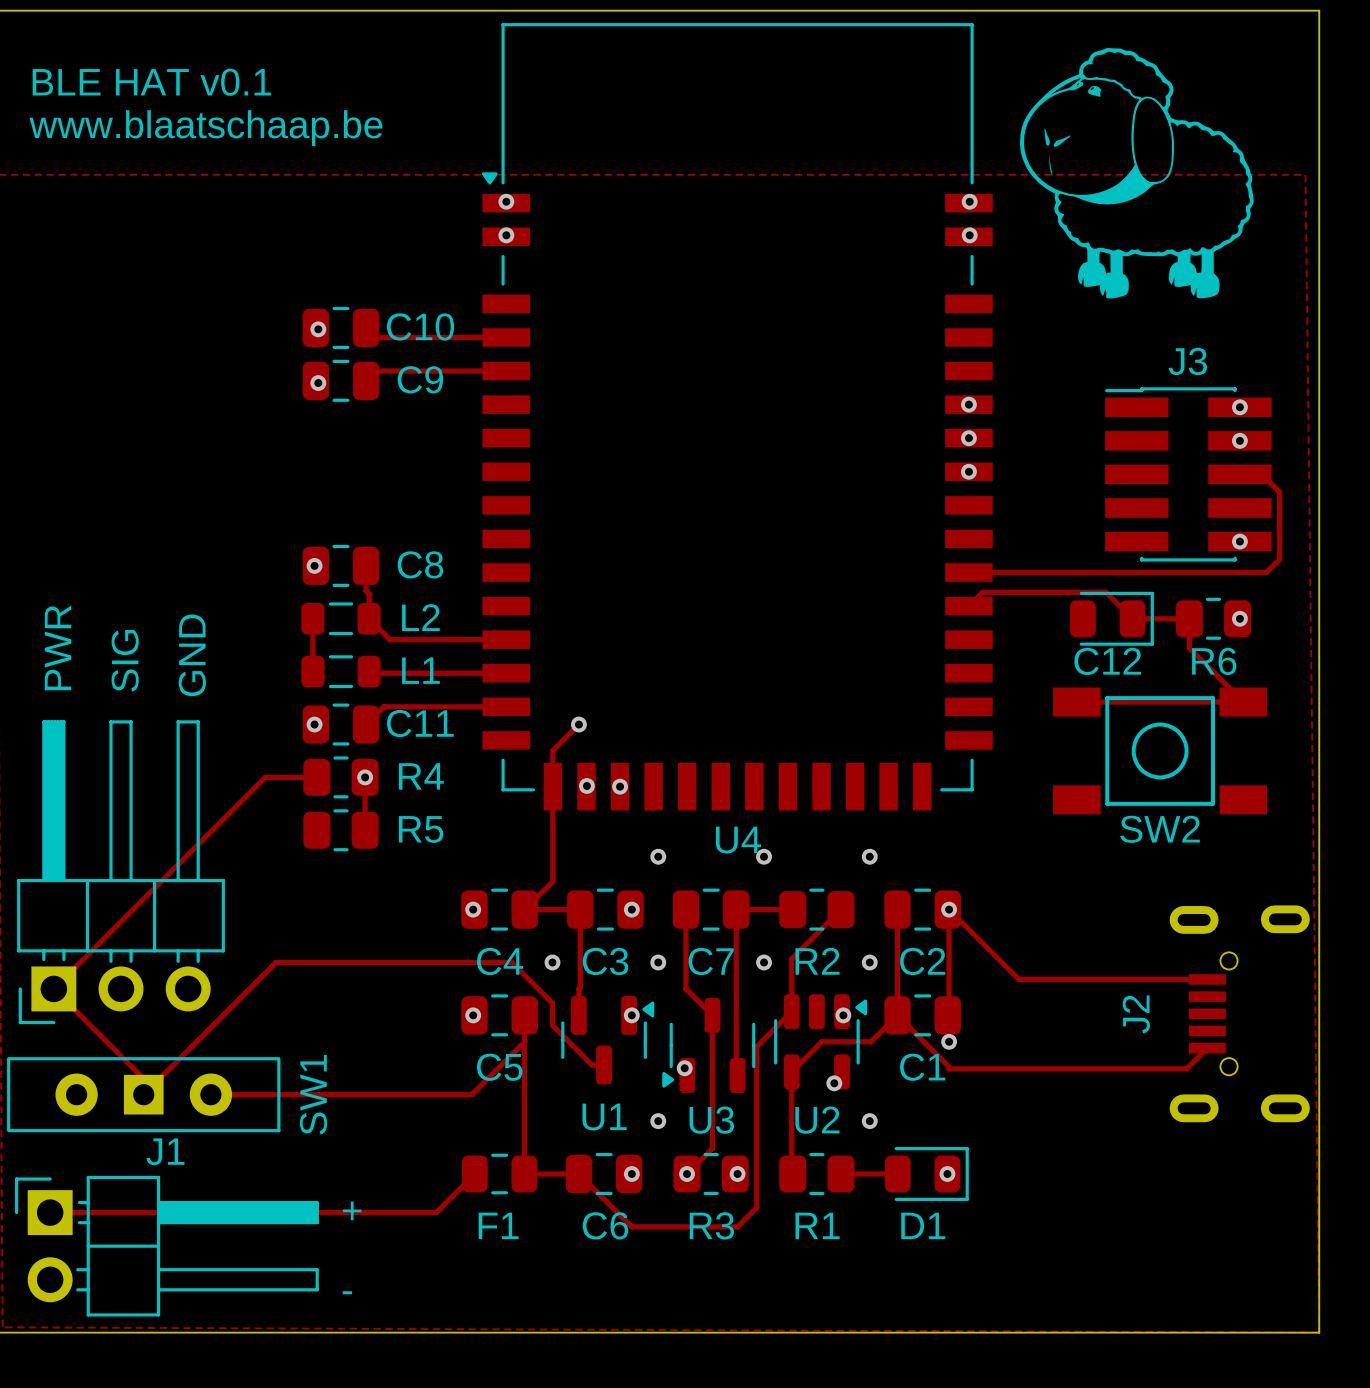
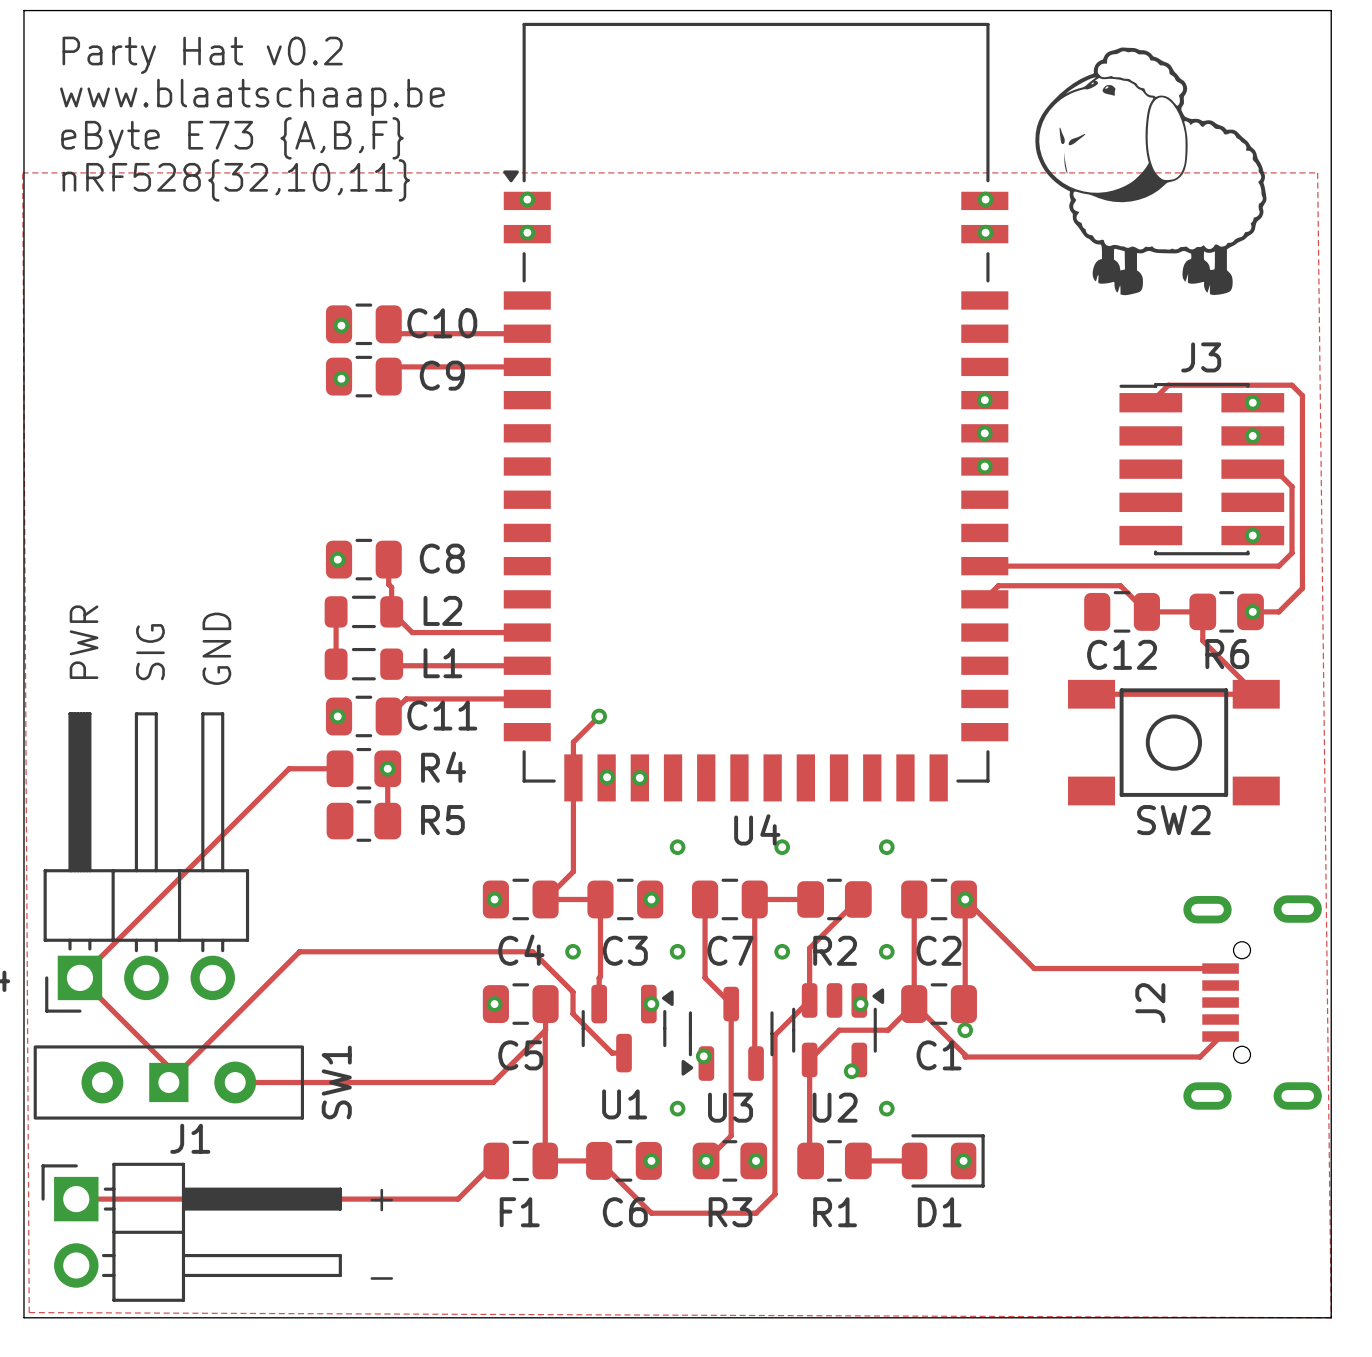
text: none -> Party Hat v0.2 (202, 55)
text: BLE HAT v0.1 (151, 82) -> www.blaatschaap.be (252, 97)
text: www.blaatschaap.be (205, 128) -> eByte E73 {A,B,F} (232, 138)
text: none -> nRF528{32,10,11} (236, 180)
track: none -> (1150, 402) (1168, 385) (1292, 385) (1302, 395) (1302, 588) (1278, 611) (1252, 611)
C12 footprint: [1070, 591, 1154, 646] -> [1084, 591, 1160, 633]

